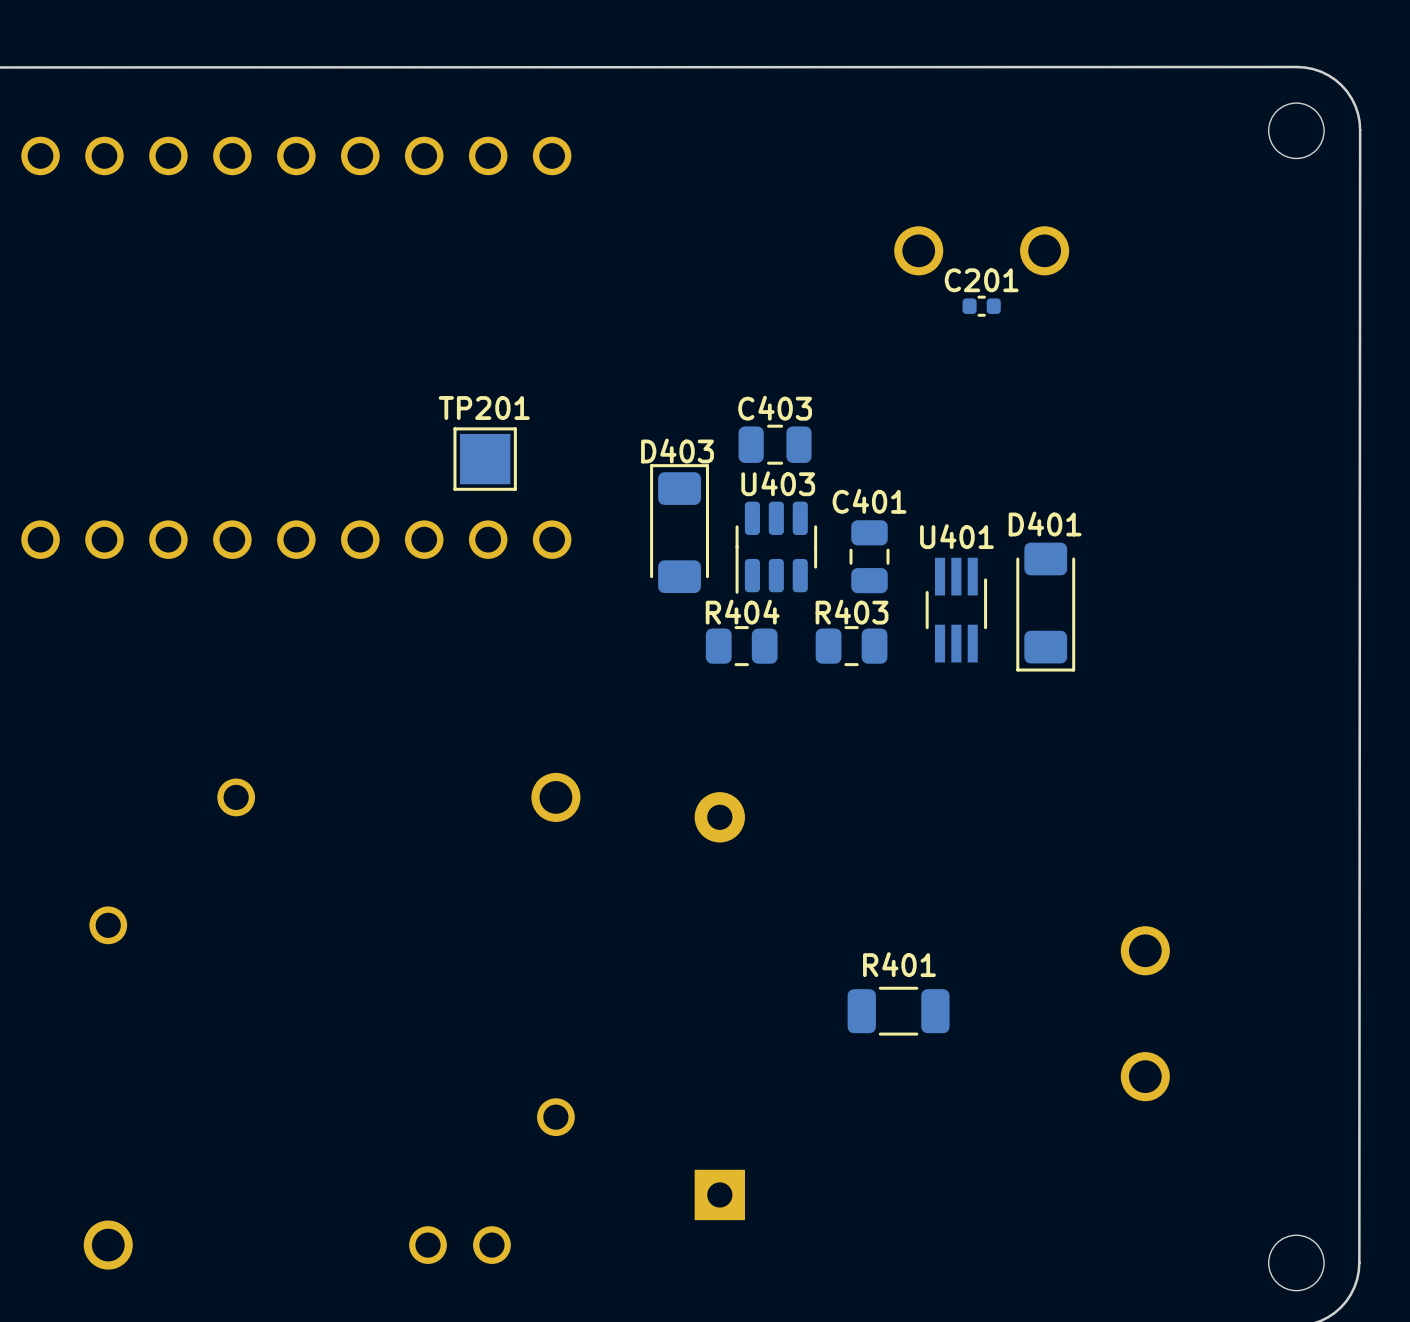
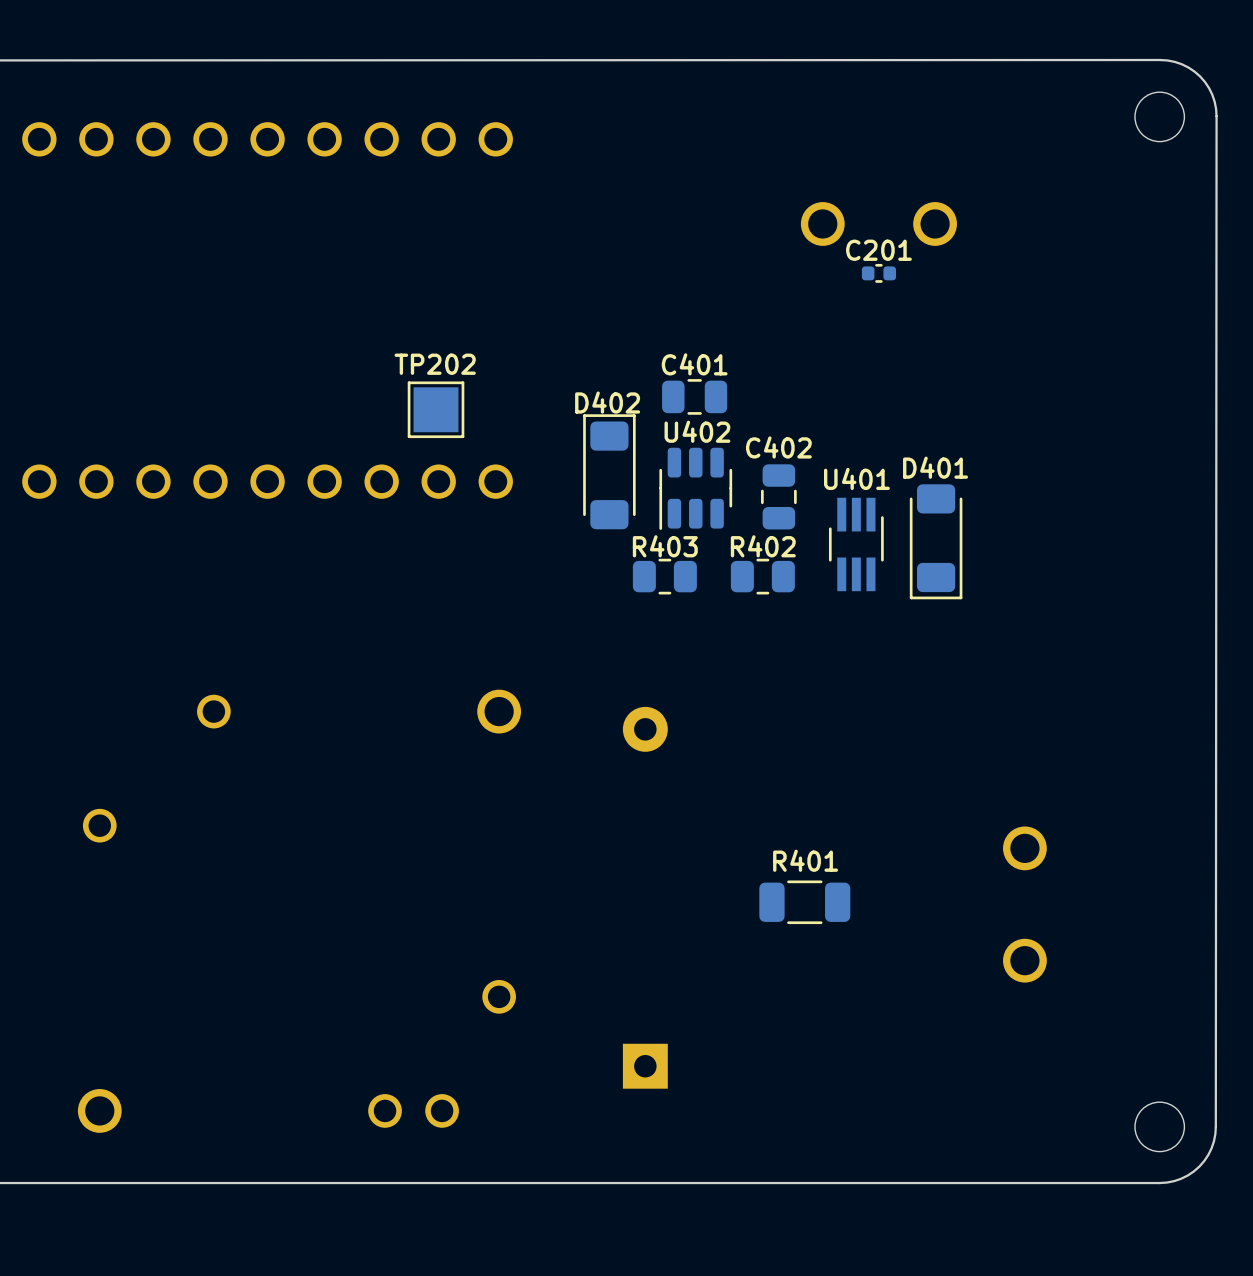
TP201 name: TP201 (484, 408) -> TP202 (435, 364)
C403 name: C403 (775, 408) -> C401 (694, 364)
D403 name: D403 (677, 451) -> D402 (607, 402)
U403 name: U403 (778, 483) -> U402 (697, 431)
C401 name: C401 (869, 501) -> C402 (778, 447)
R404 name: R404 (742, 612) -> R403 (665, 546)
R403 name: R403 (852, 612) -> R402 (763, 546)

